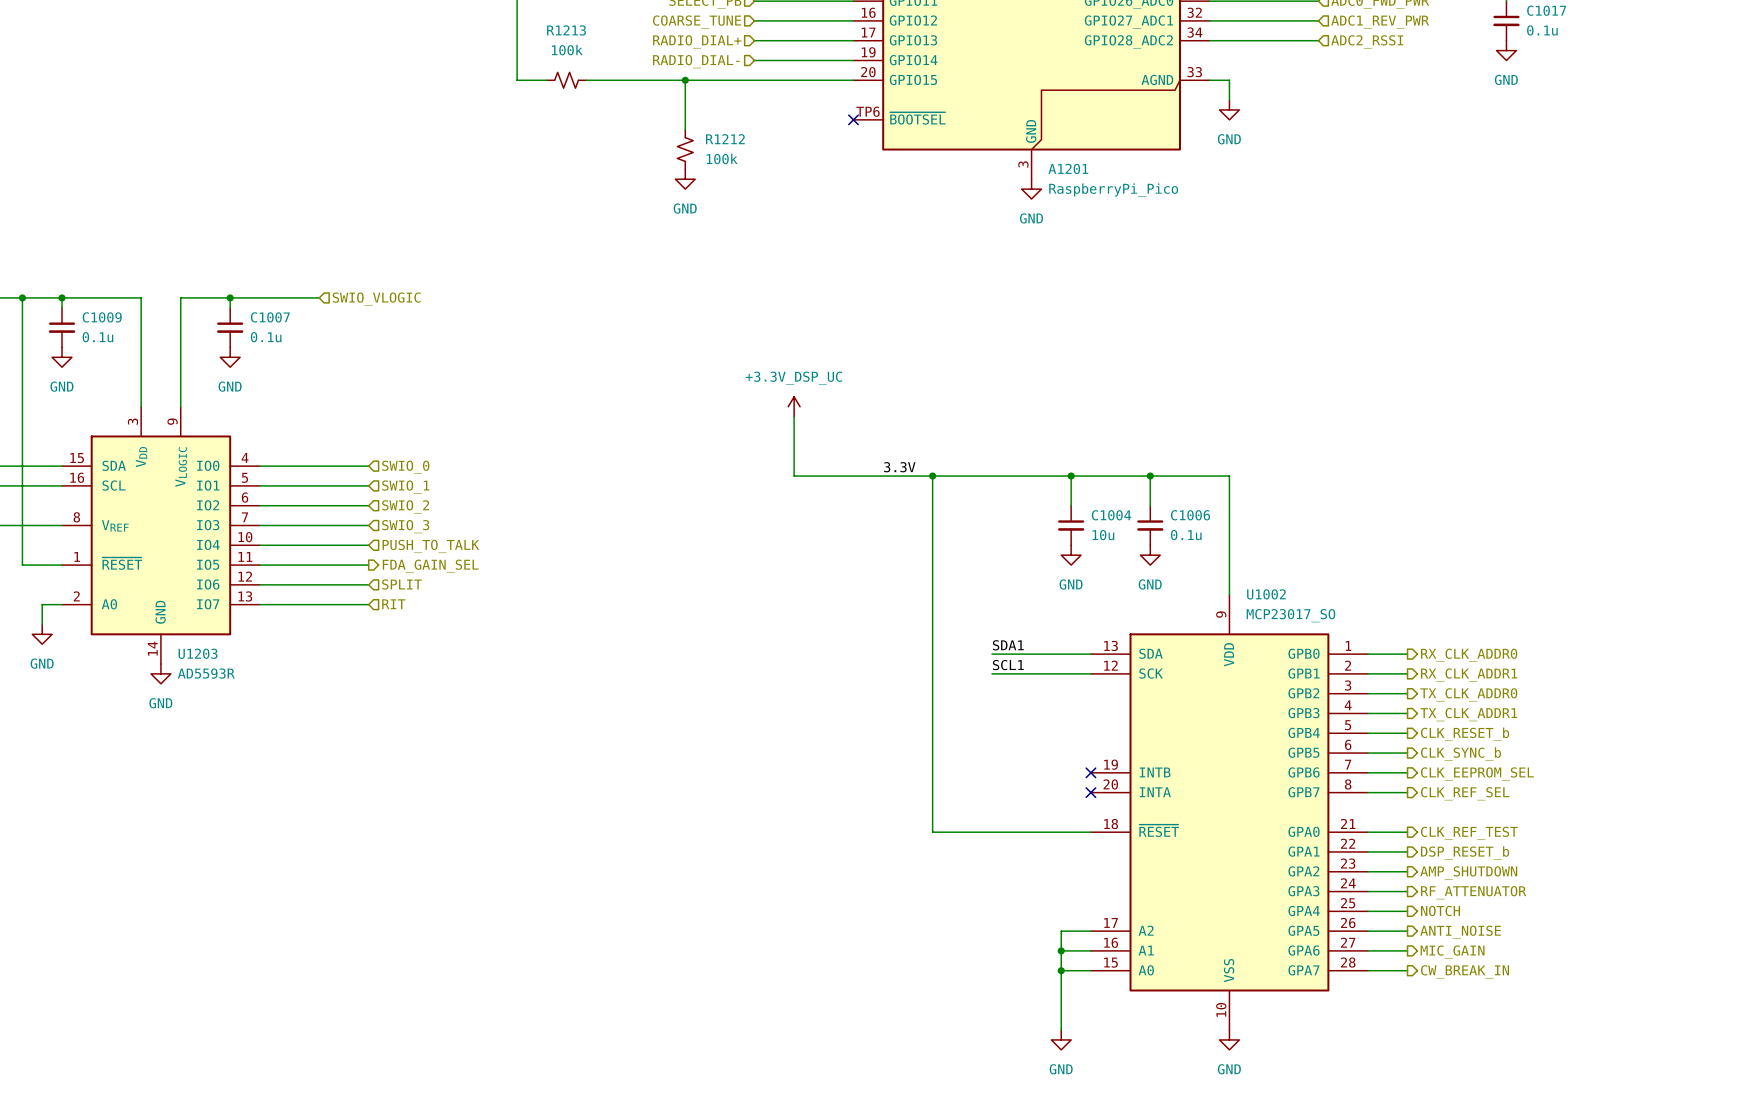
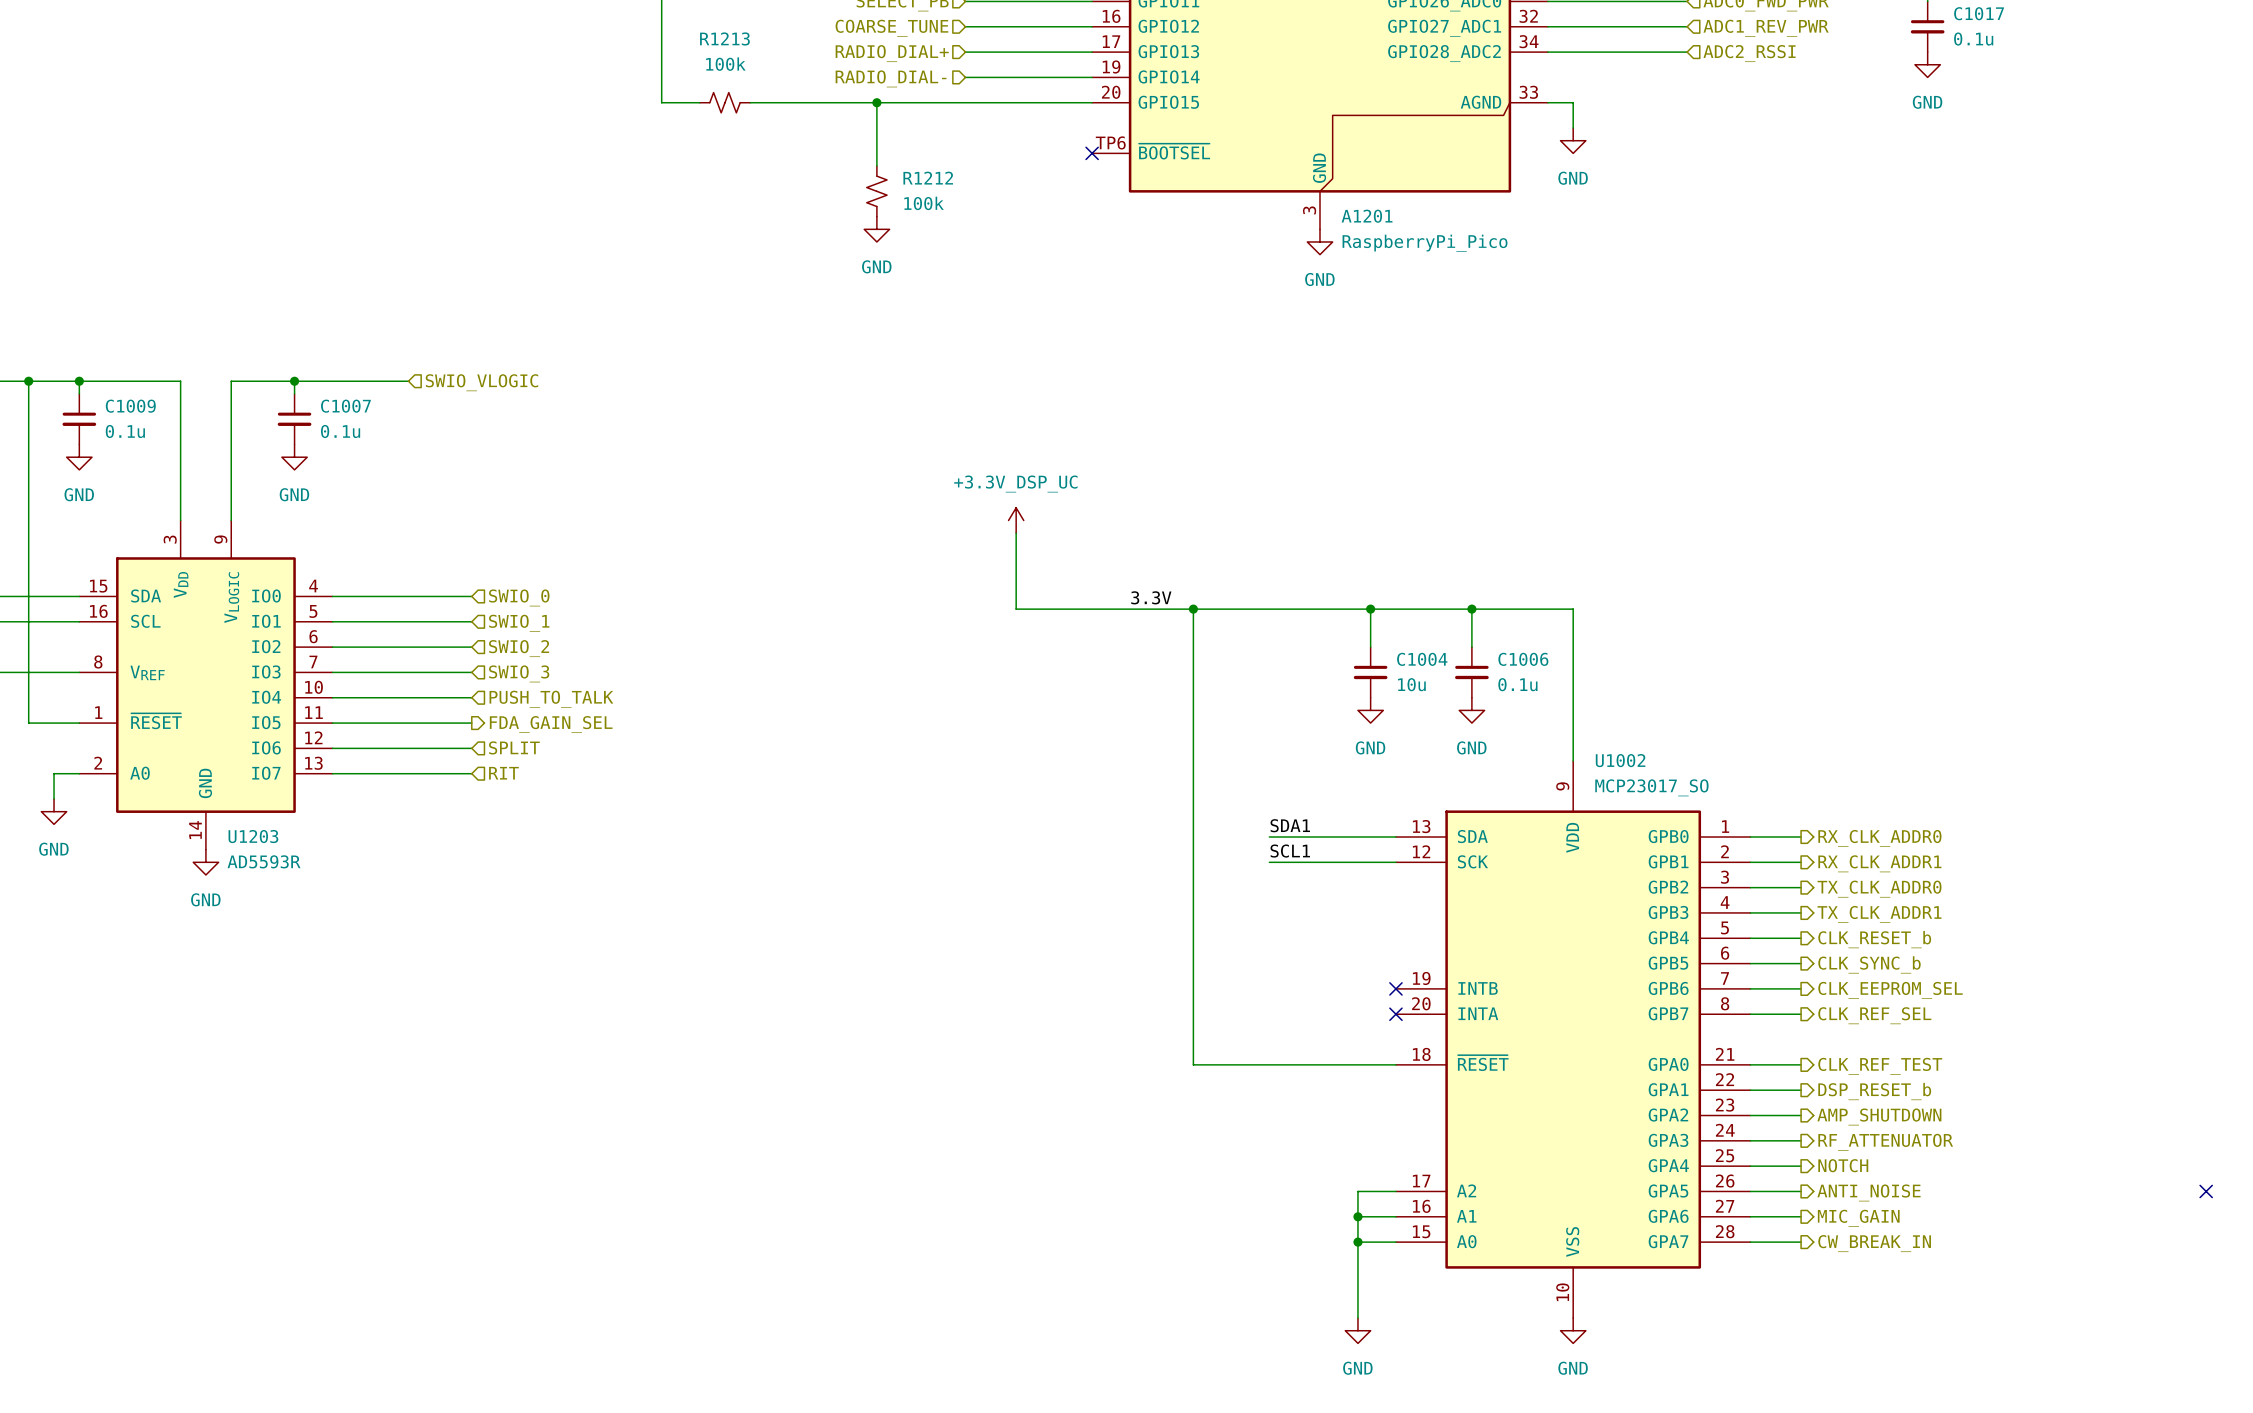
no-connect mark: none -> (2206, 1191)

